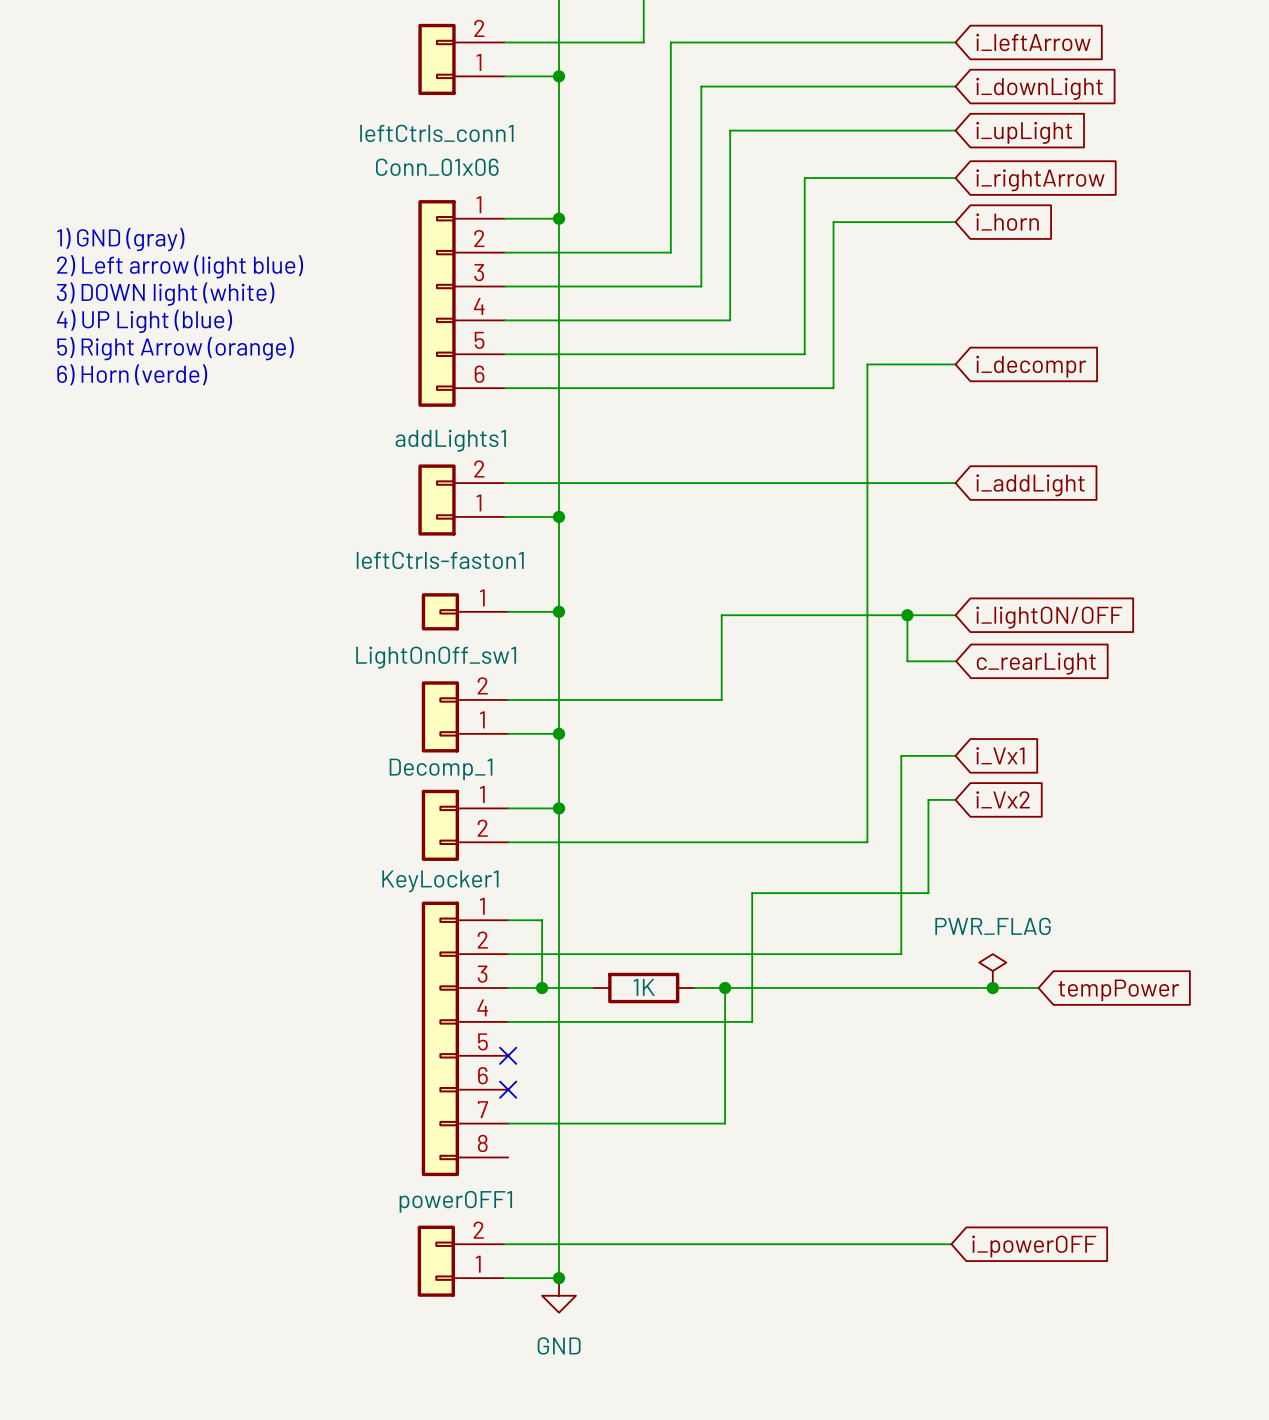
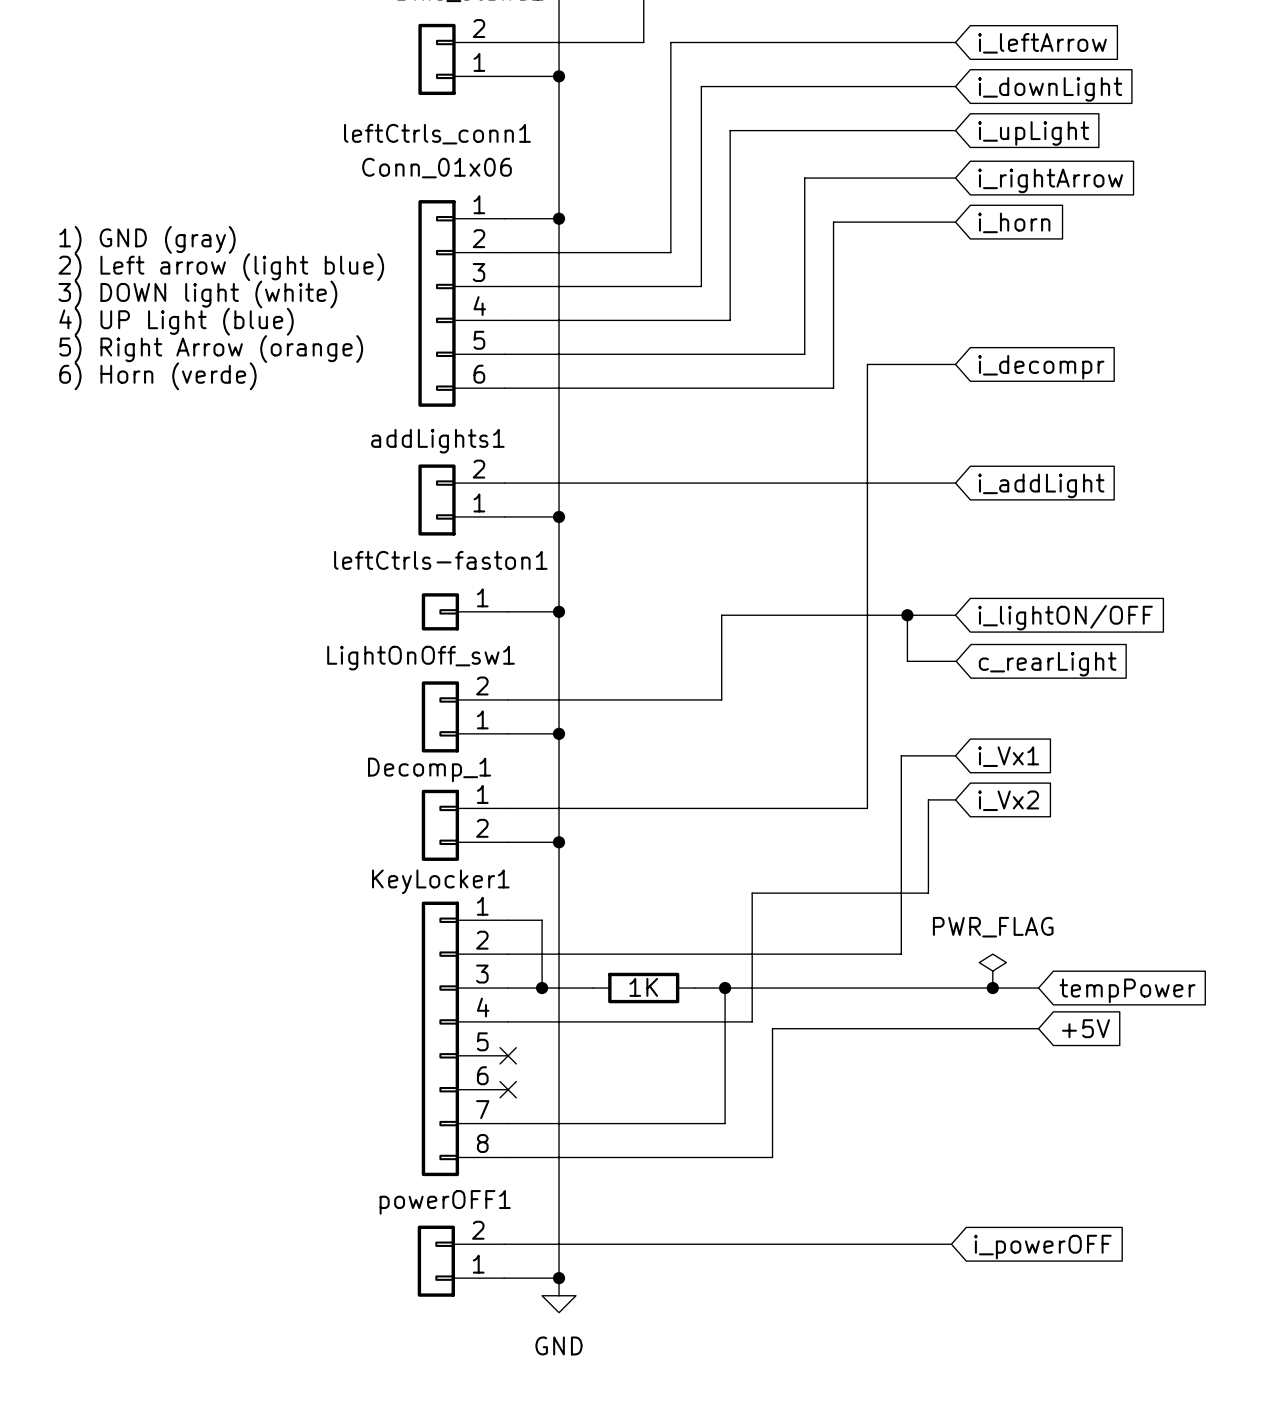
junction position: (559, 808) -> (559, 842)
wire: (867, 808) (867, 842) (559, 842) -> (867, 808) (559, 808)
wire: none -> (1038, 1028) (772, 1028) (772, 1157) (508, 1157)
global label: none -> +5V (1085, 1028)

